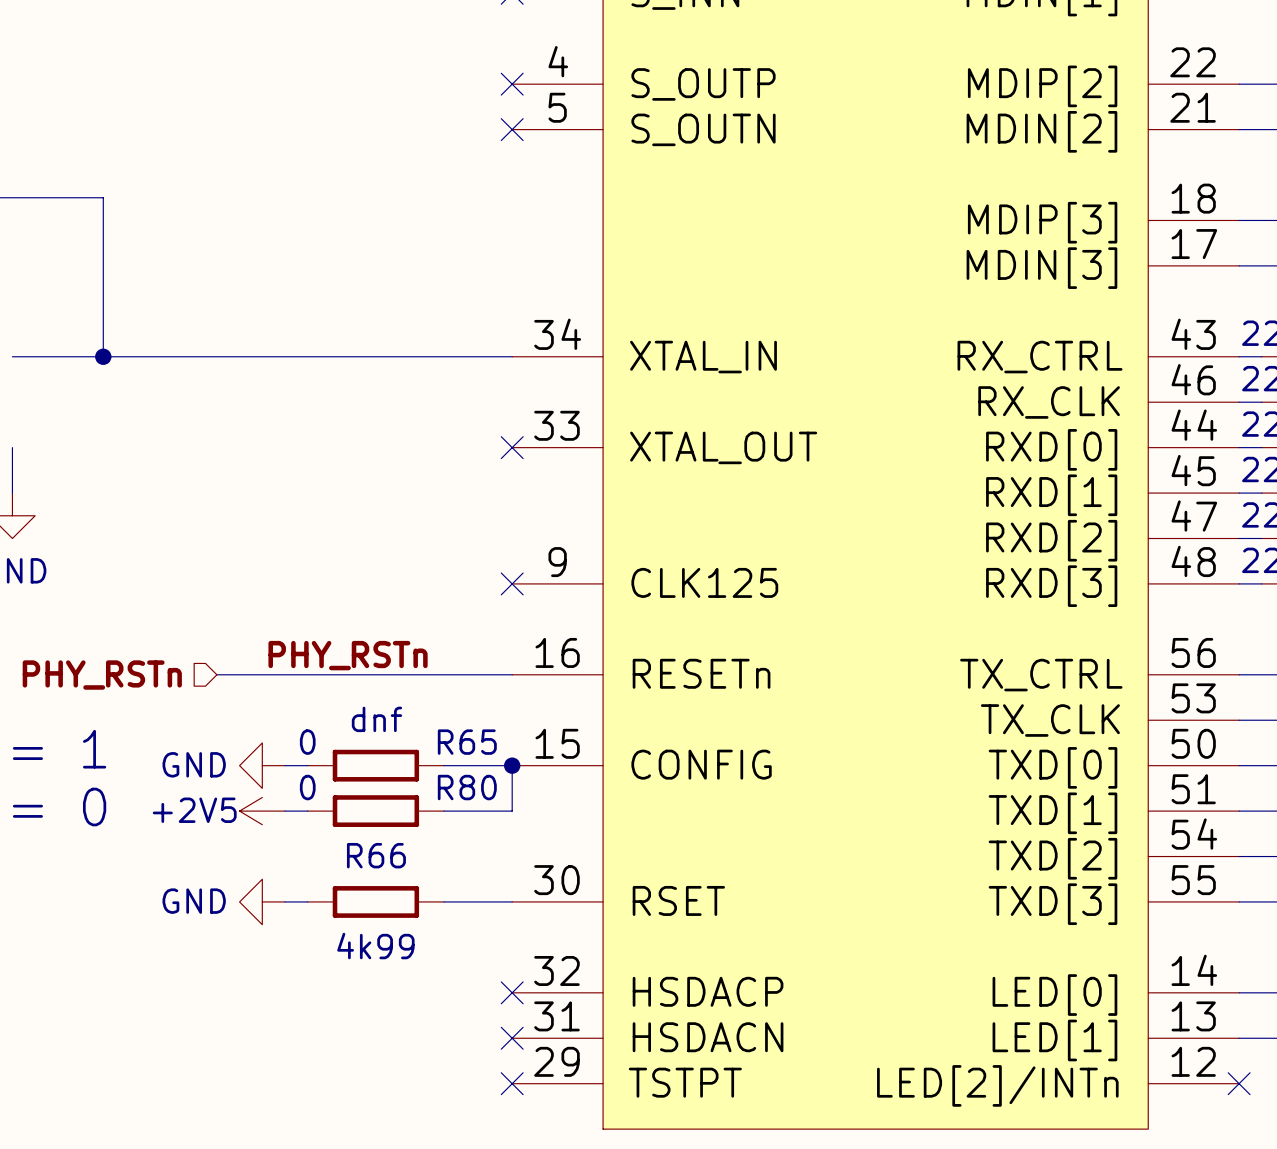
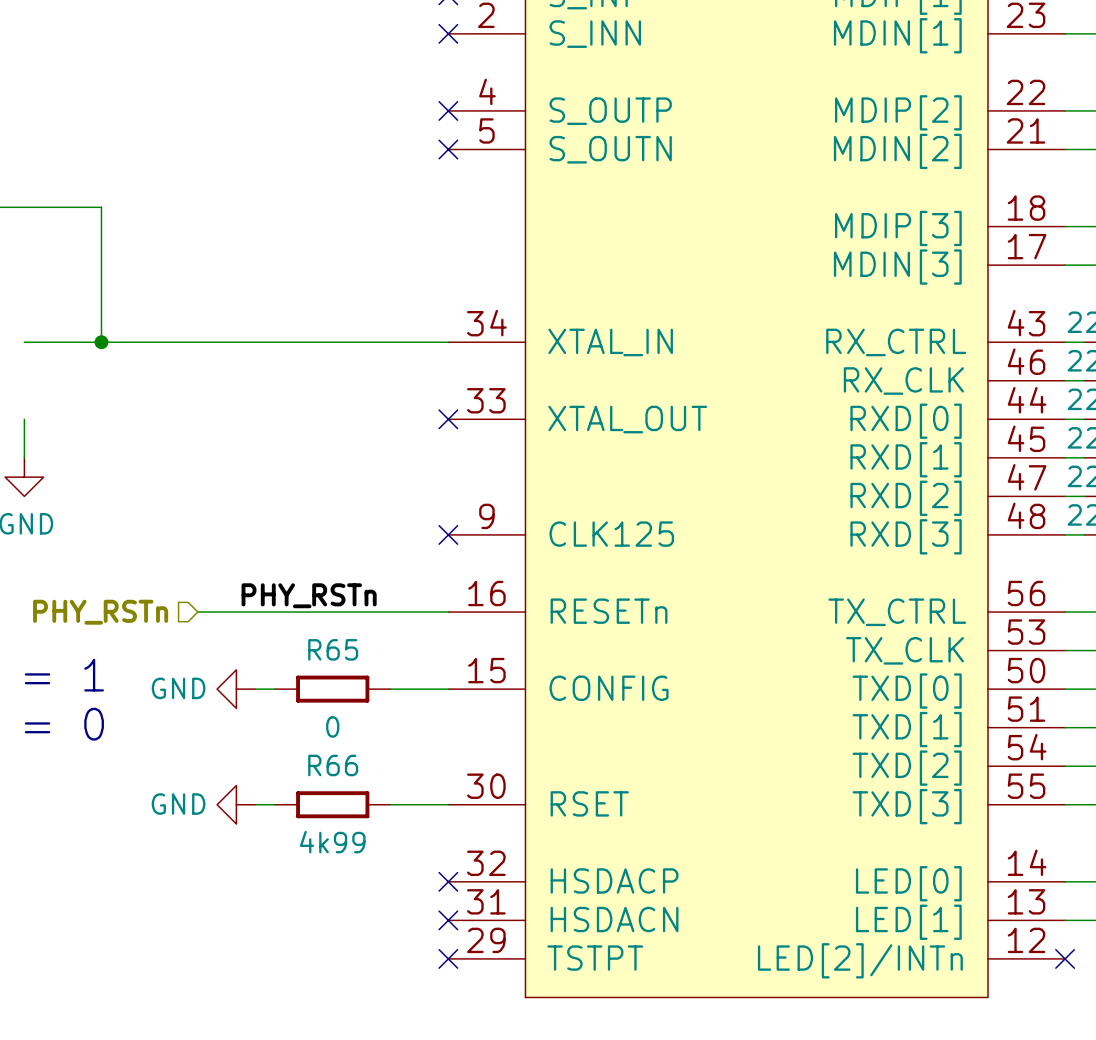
R65 text: dnf (376, 719) -> none
R65 text position: 0 (307, 742) -> 0 (332, 726)
R65 name position: R65 (467, 742) -> R65 (333, 649)
wire: (512, 765) (512, 811) (444, 811) -> none
junction: (512, 765) -> none
power symbol: +2V5 (262, 811) -> none
wire: (285, 811) (307, 811) -> none
R80: (375, 811) -> none

